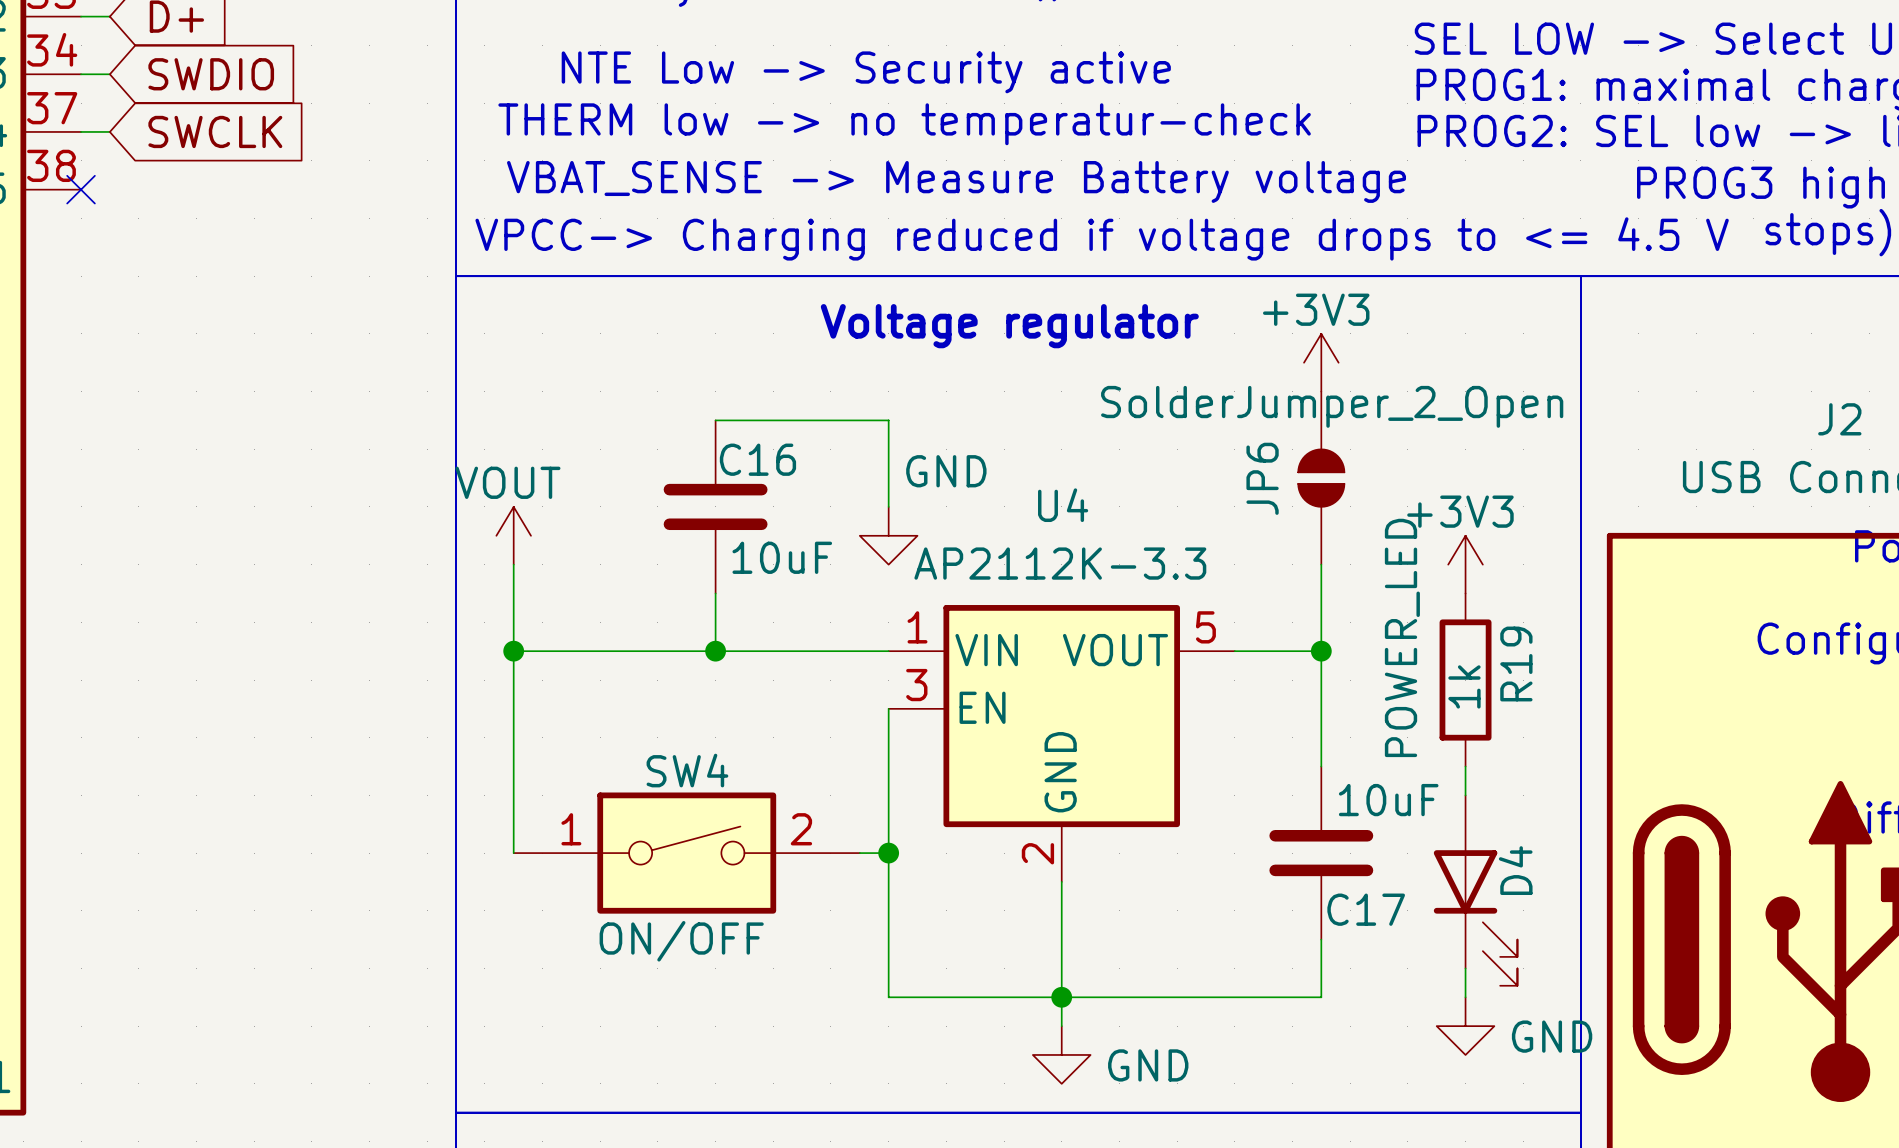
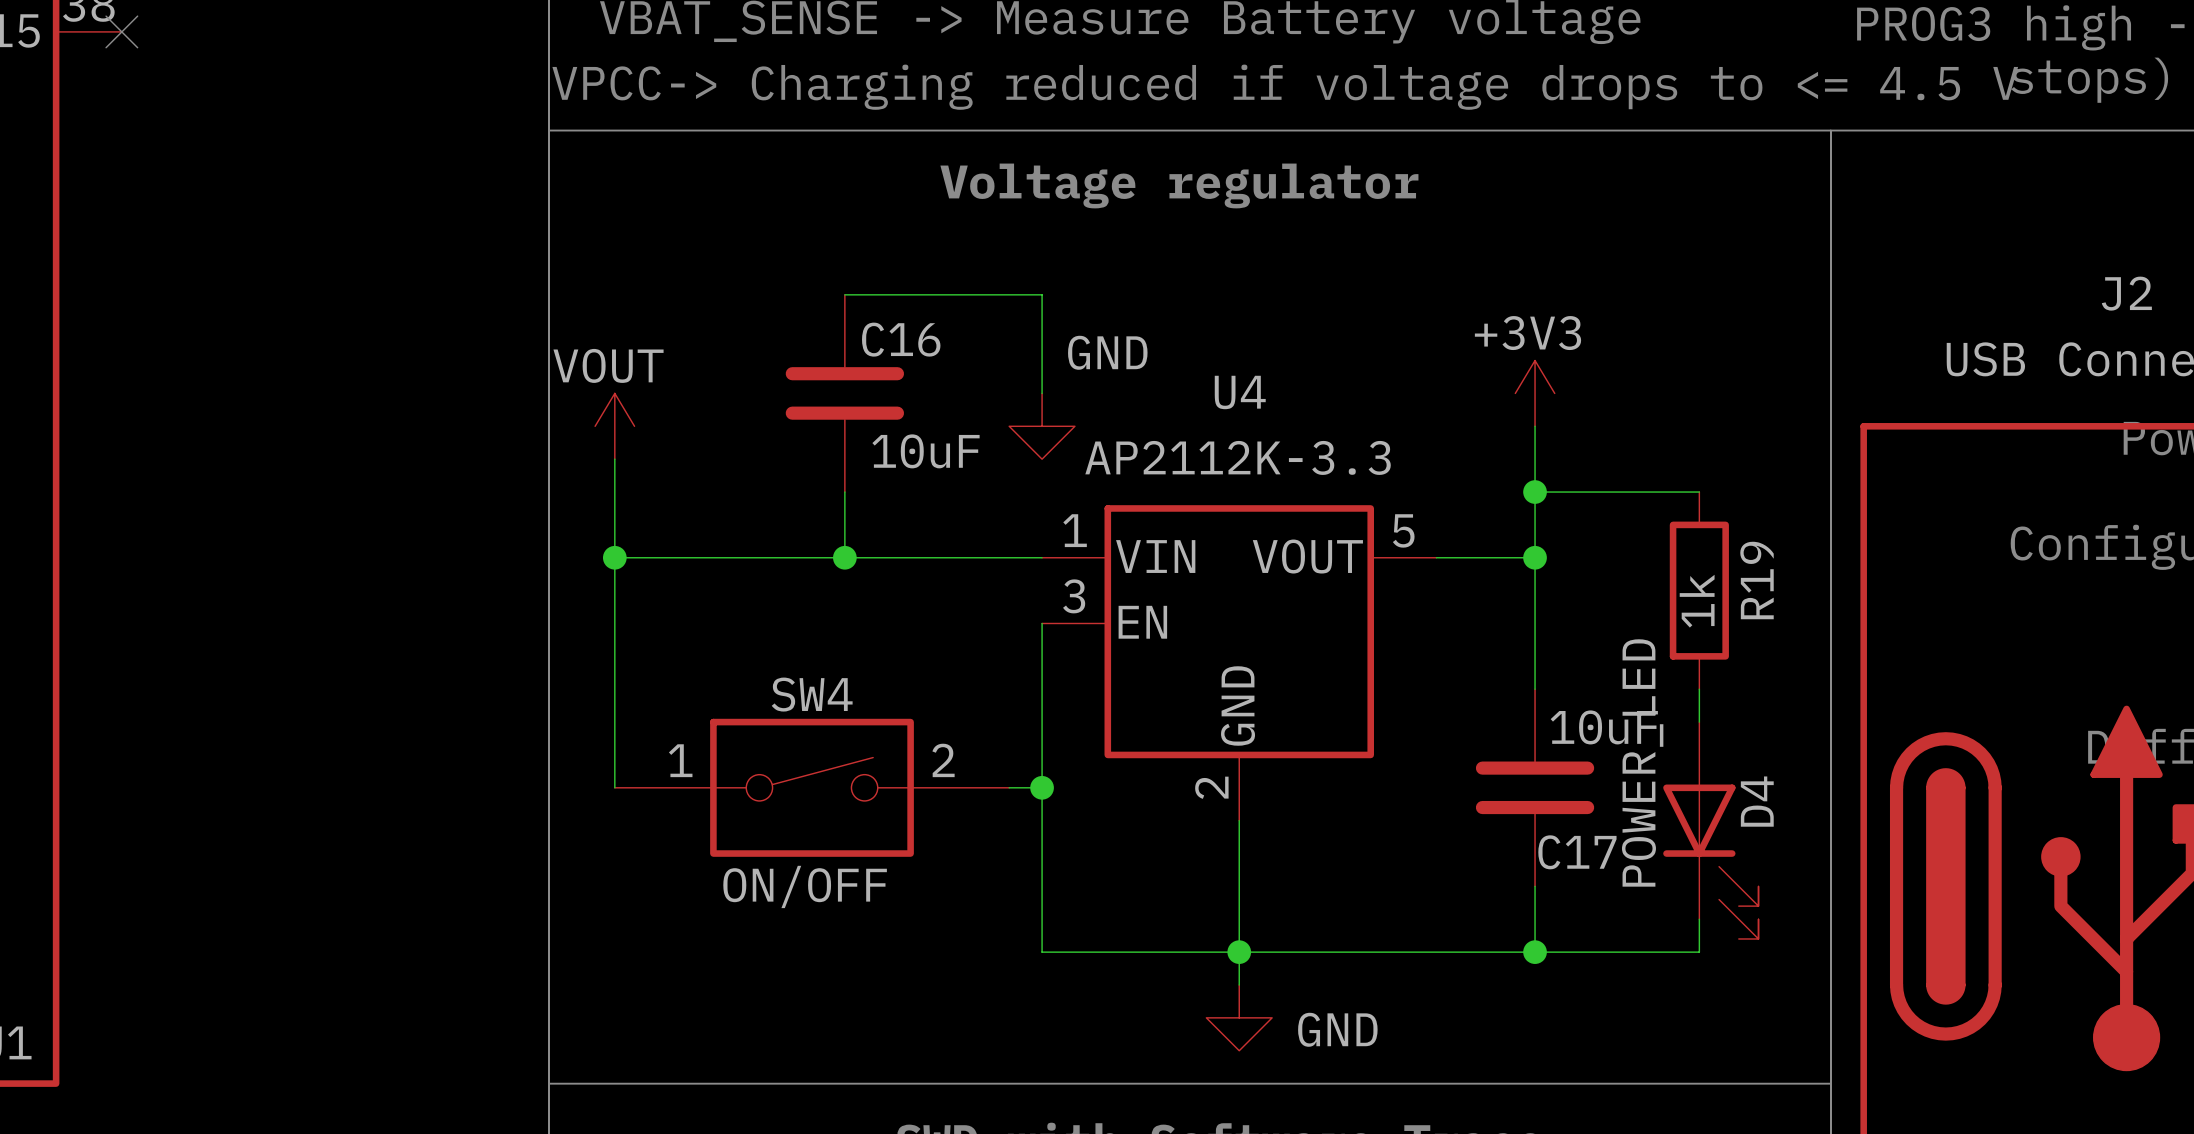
power symbol: +3V3 (1321, 362) -> none
JP6: SolderJumper_2_Open (1321, 478) -> none
power symbol: none -> +3V3 (1535, 393)
power symbol: +3V3 (1465, 564) -> none
wire: none -> (1535, 492) (1699, 492)
junction: none -> (1535, 492)
D4 value position: POWER_LED (1402, 637) -> POWER_LED (1642, 762)
wire: none -> (1535, 952) (1699, 952)
junction: none -> (1535, 952)
power symbol: GND (1465, 1026) -> none

